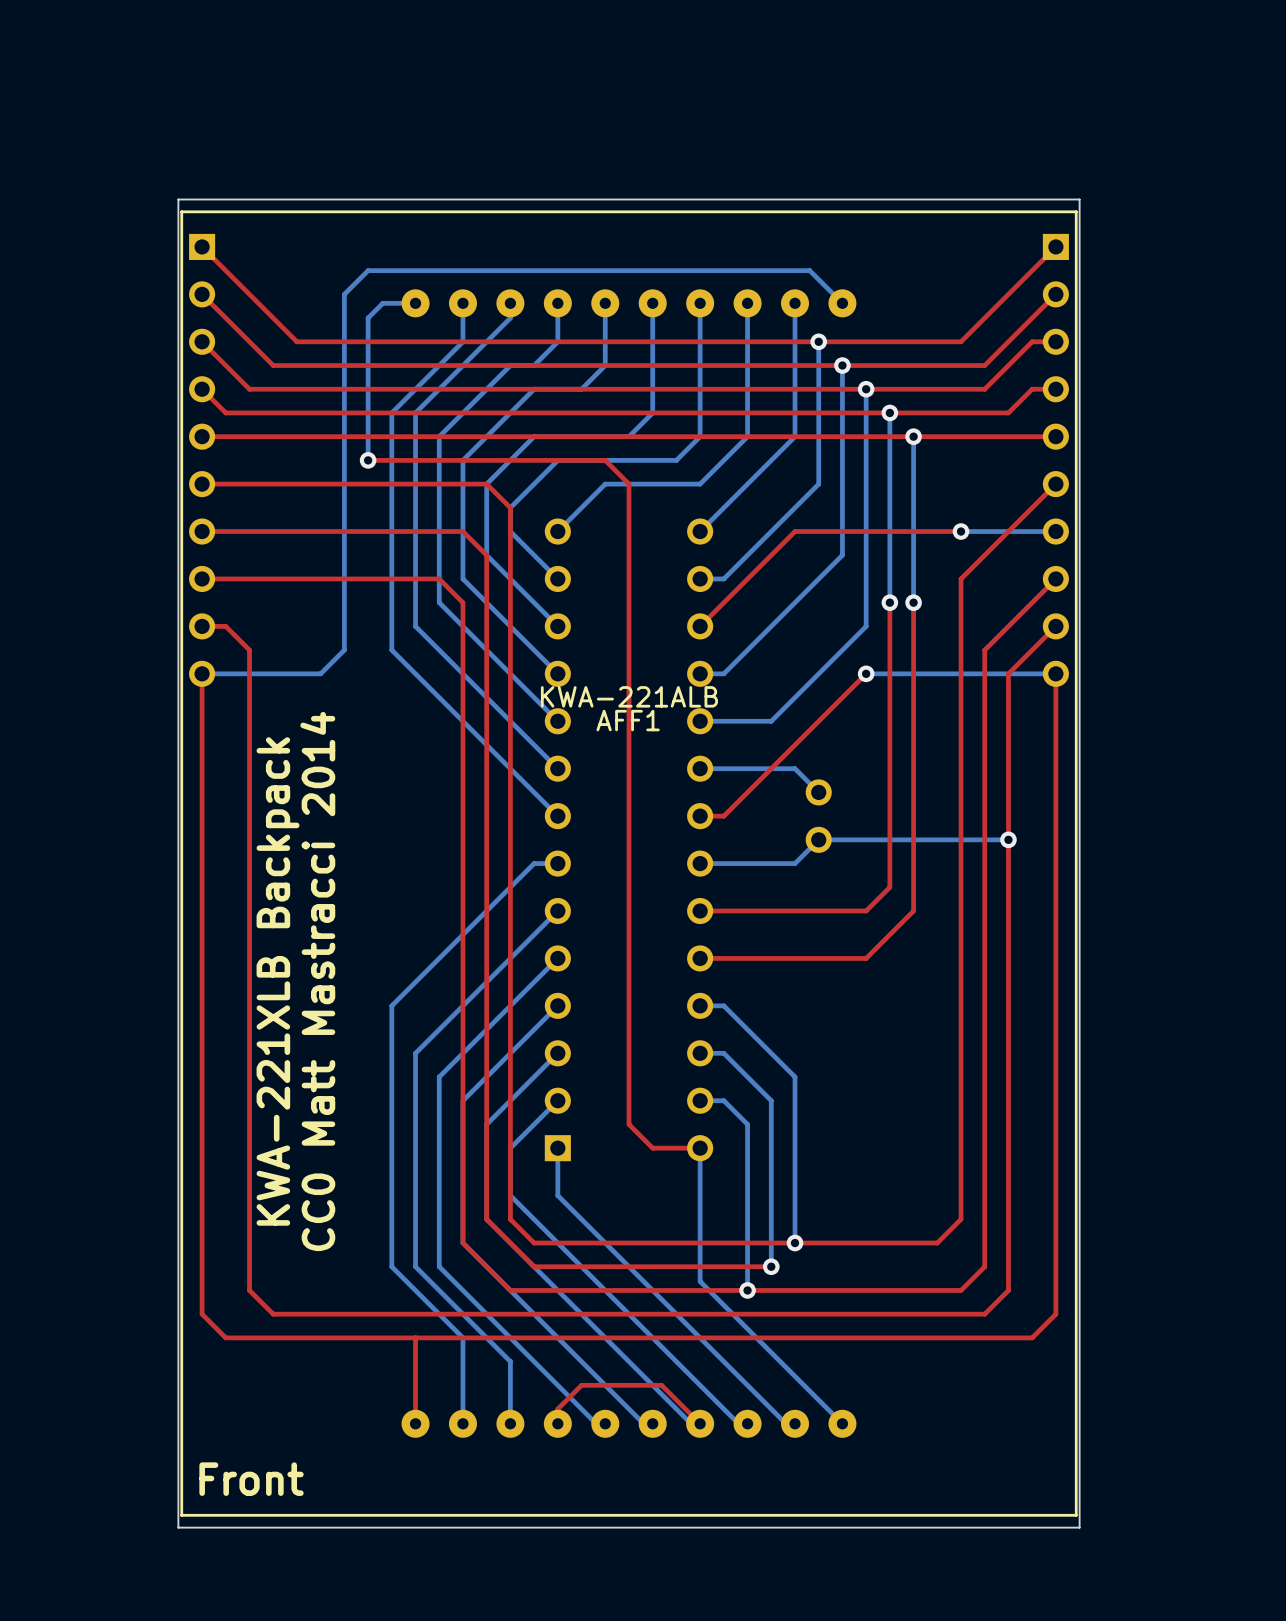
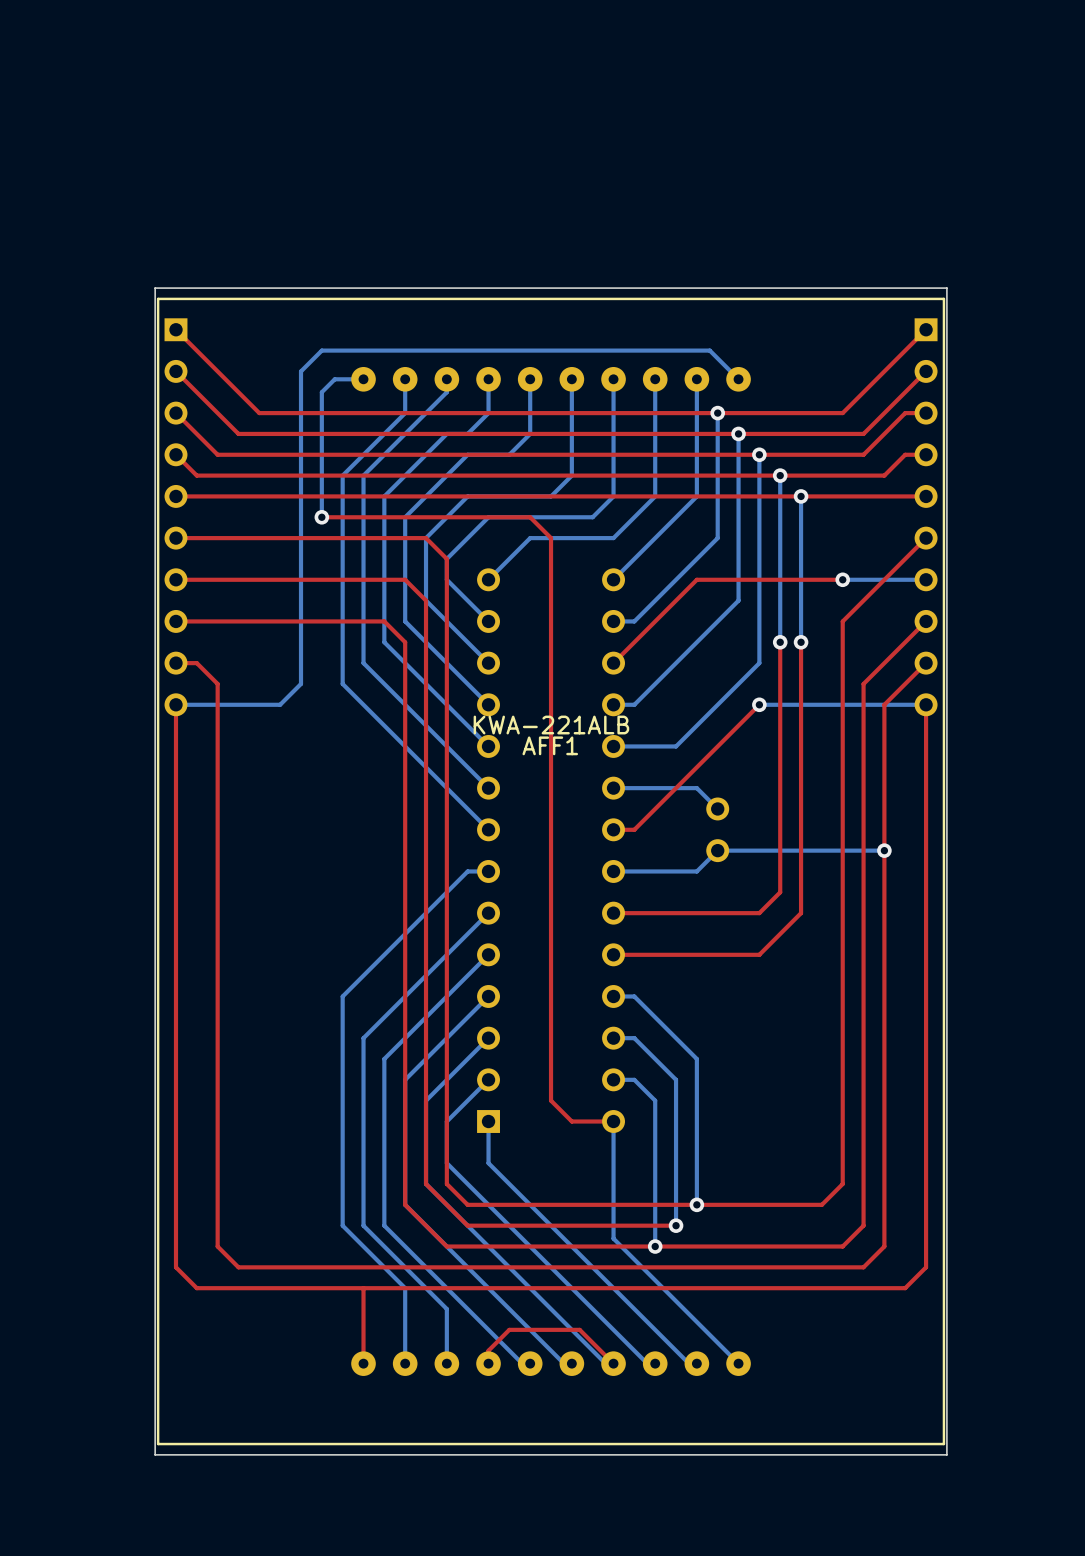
text: KWA-221XLB Backpack (278, 981) -> none
text: CC0 Matt Mastracci 2014 (317, 981) -> none
text: Front (251, 1479) -> none

